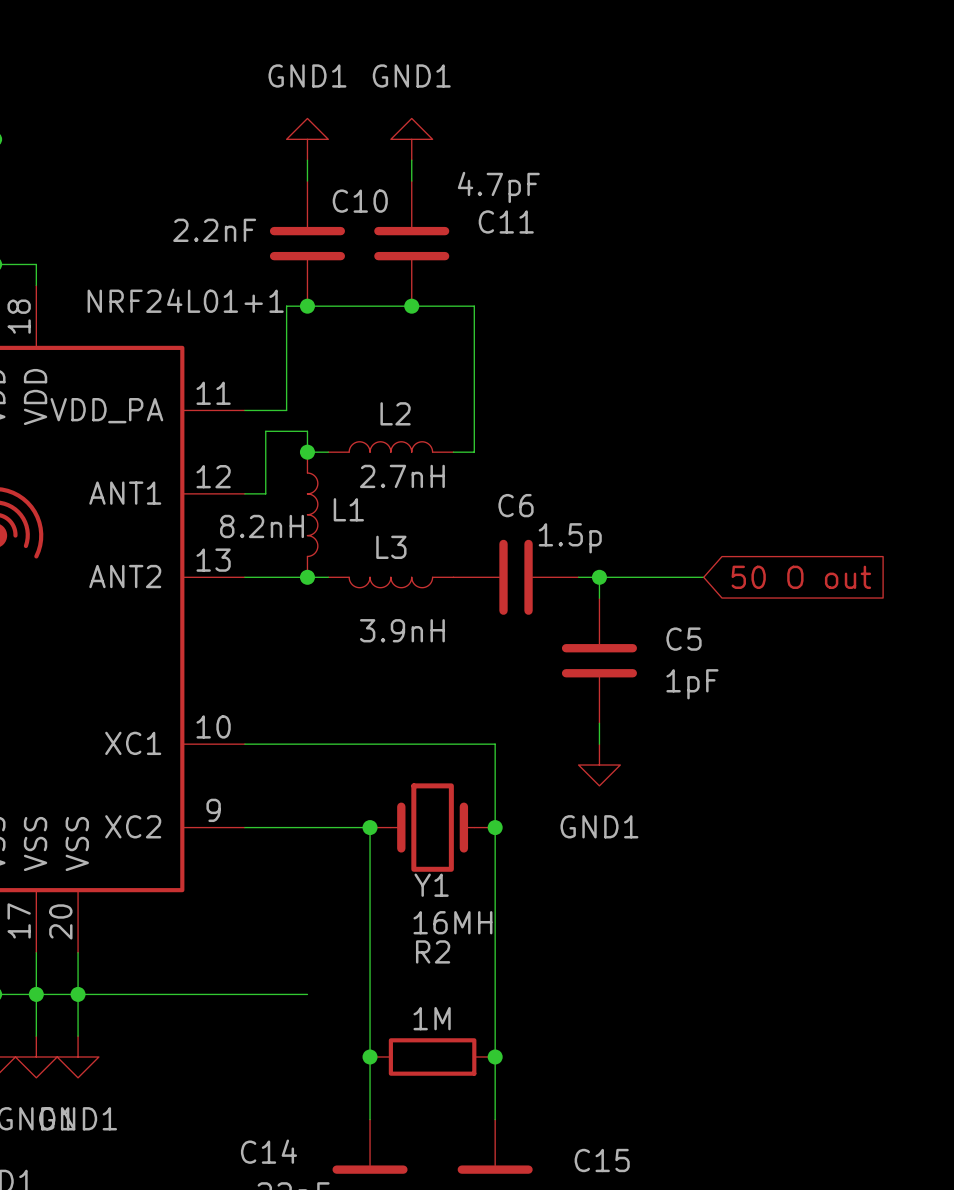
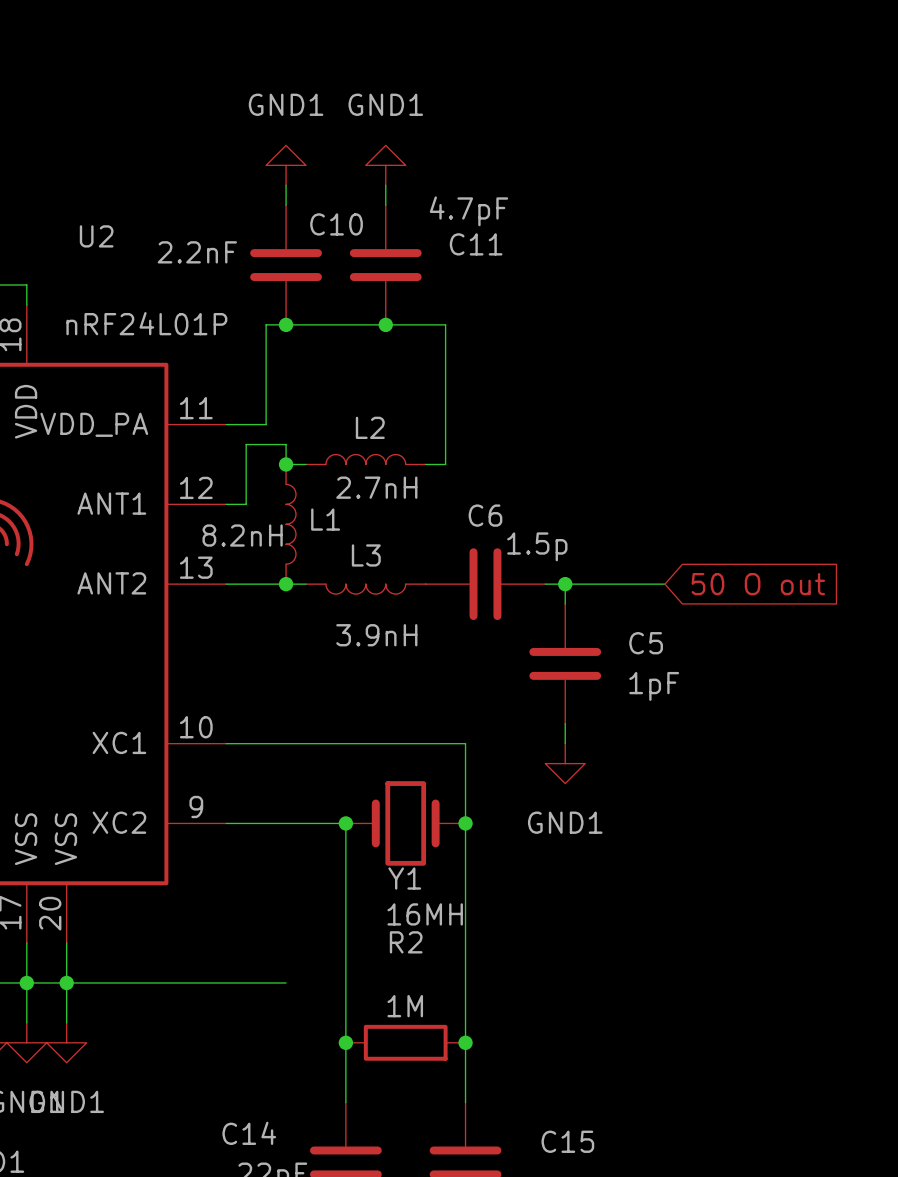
NRF24L01+1 name: NRF24L01+1 (185, 300) -> U2 (96, 236)
NRF24L01+1 value: none -> nRF24L01P (146, 323)

